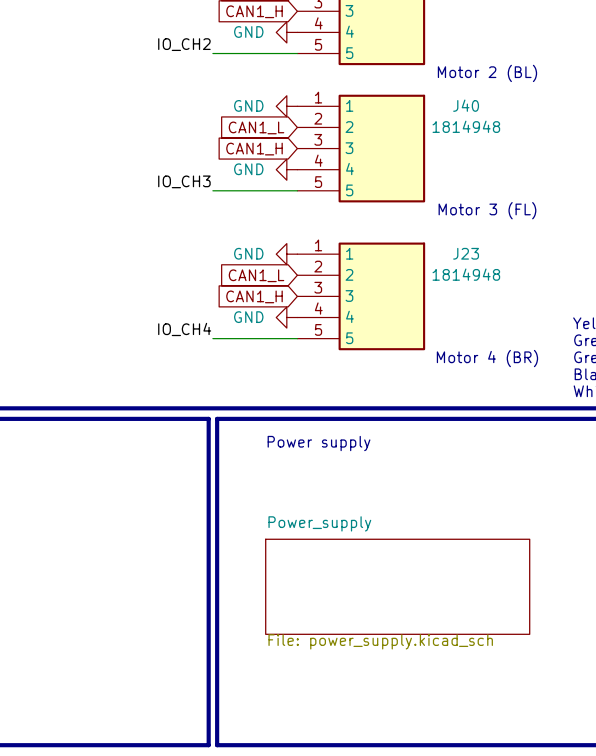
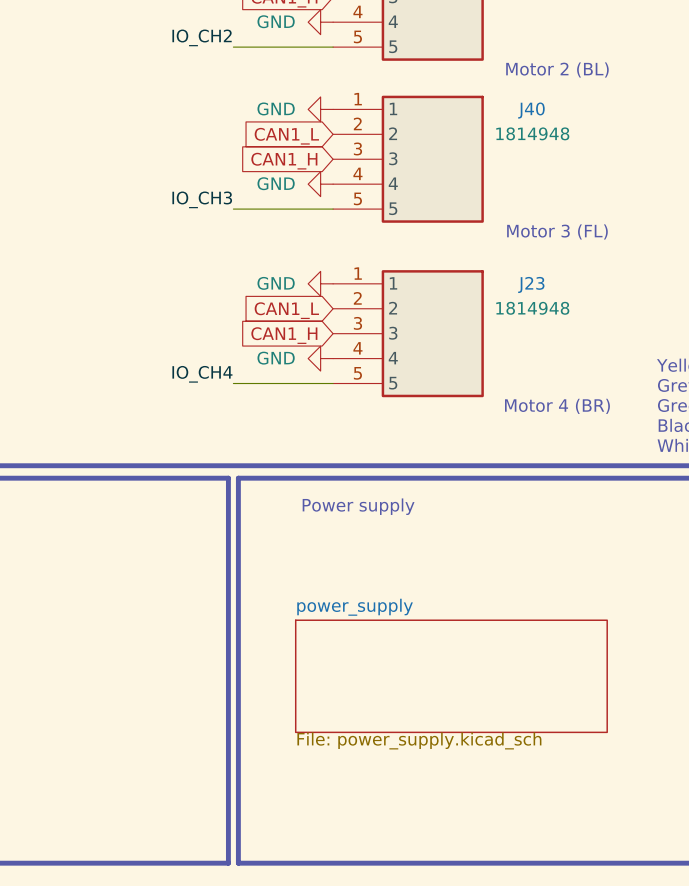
sheet Power_supply name: Power_supply (319, 523) -> power_supply (355, 607)

